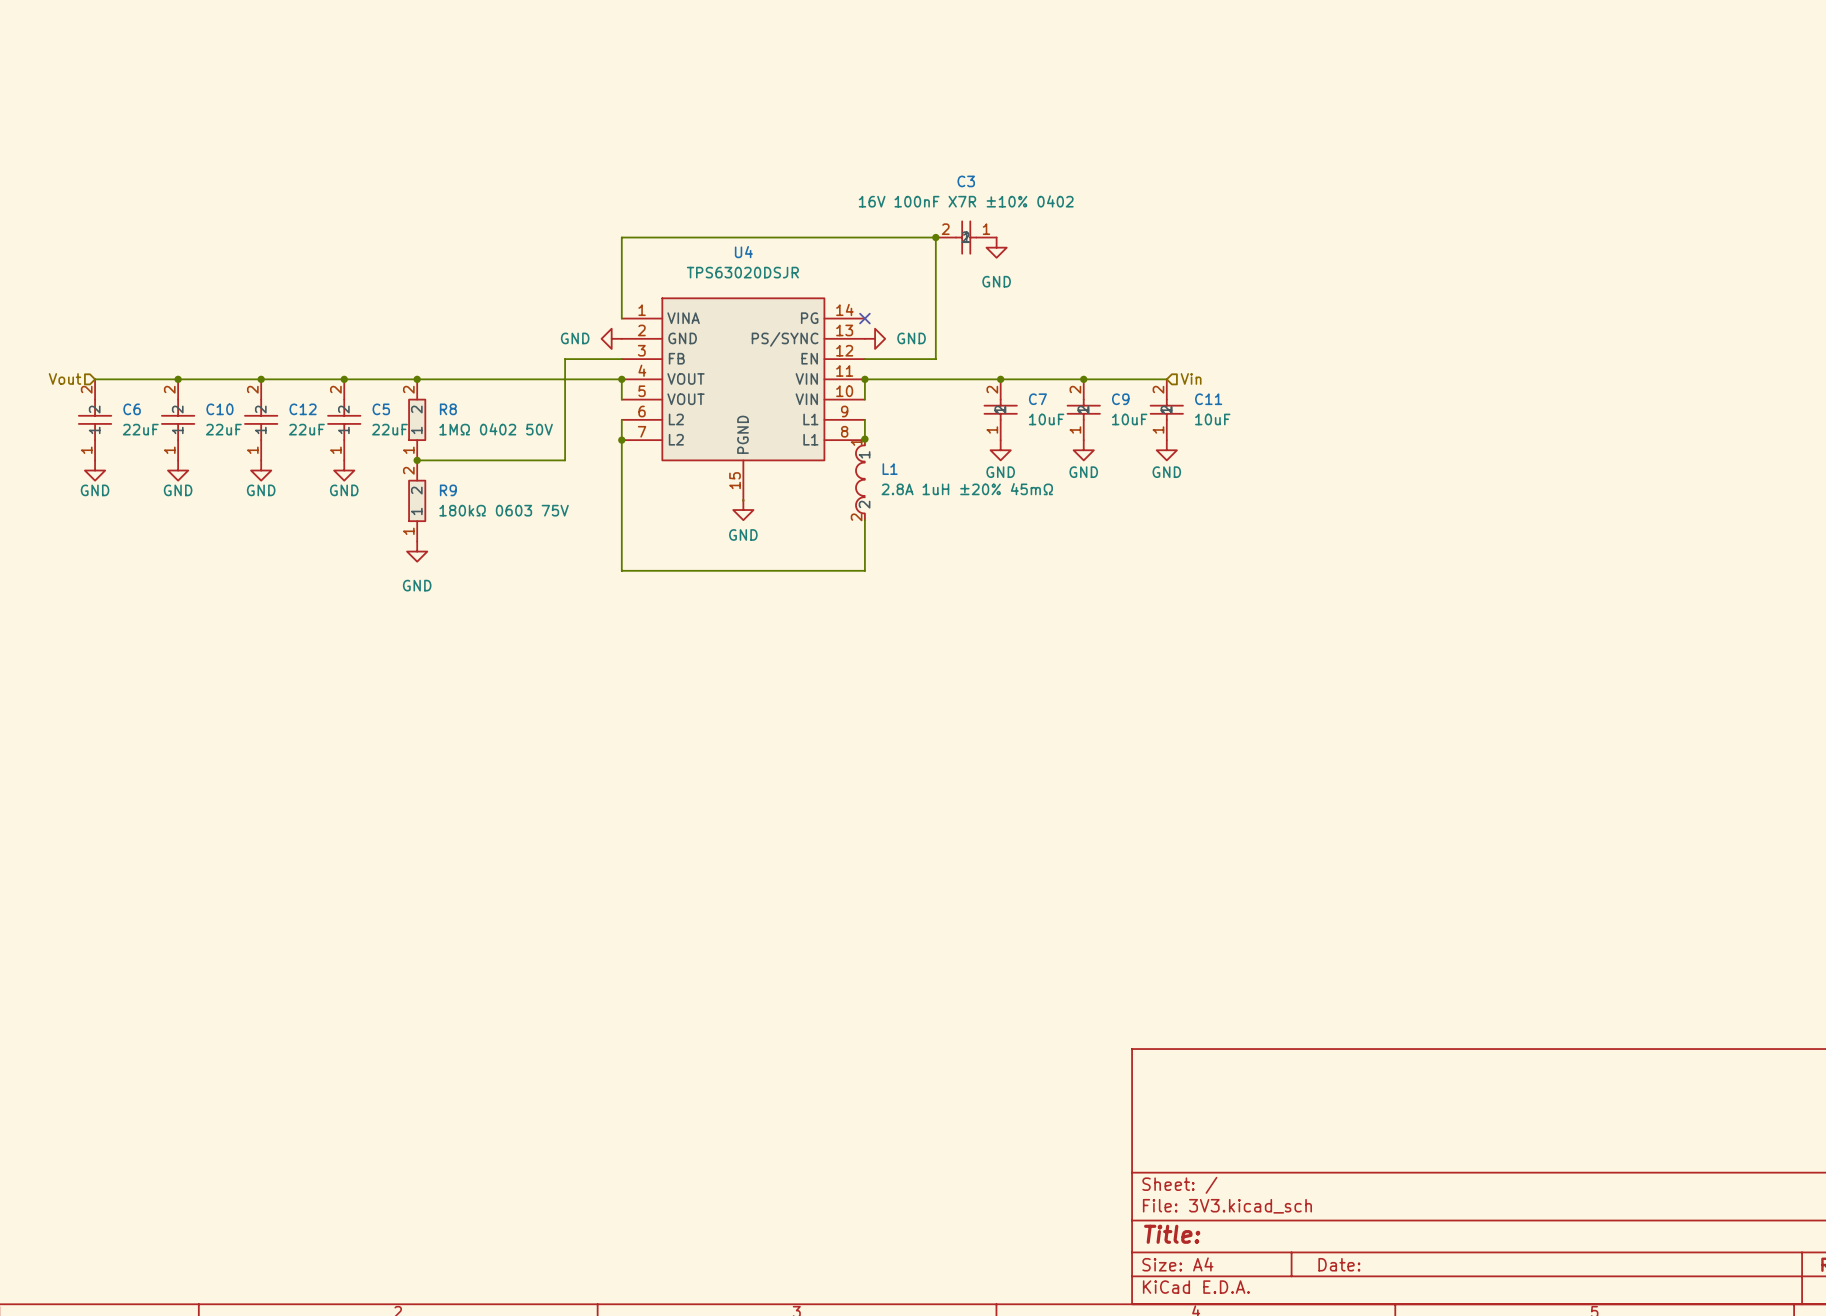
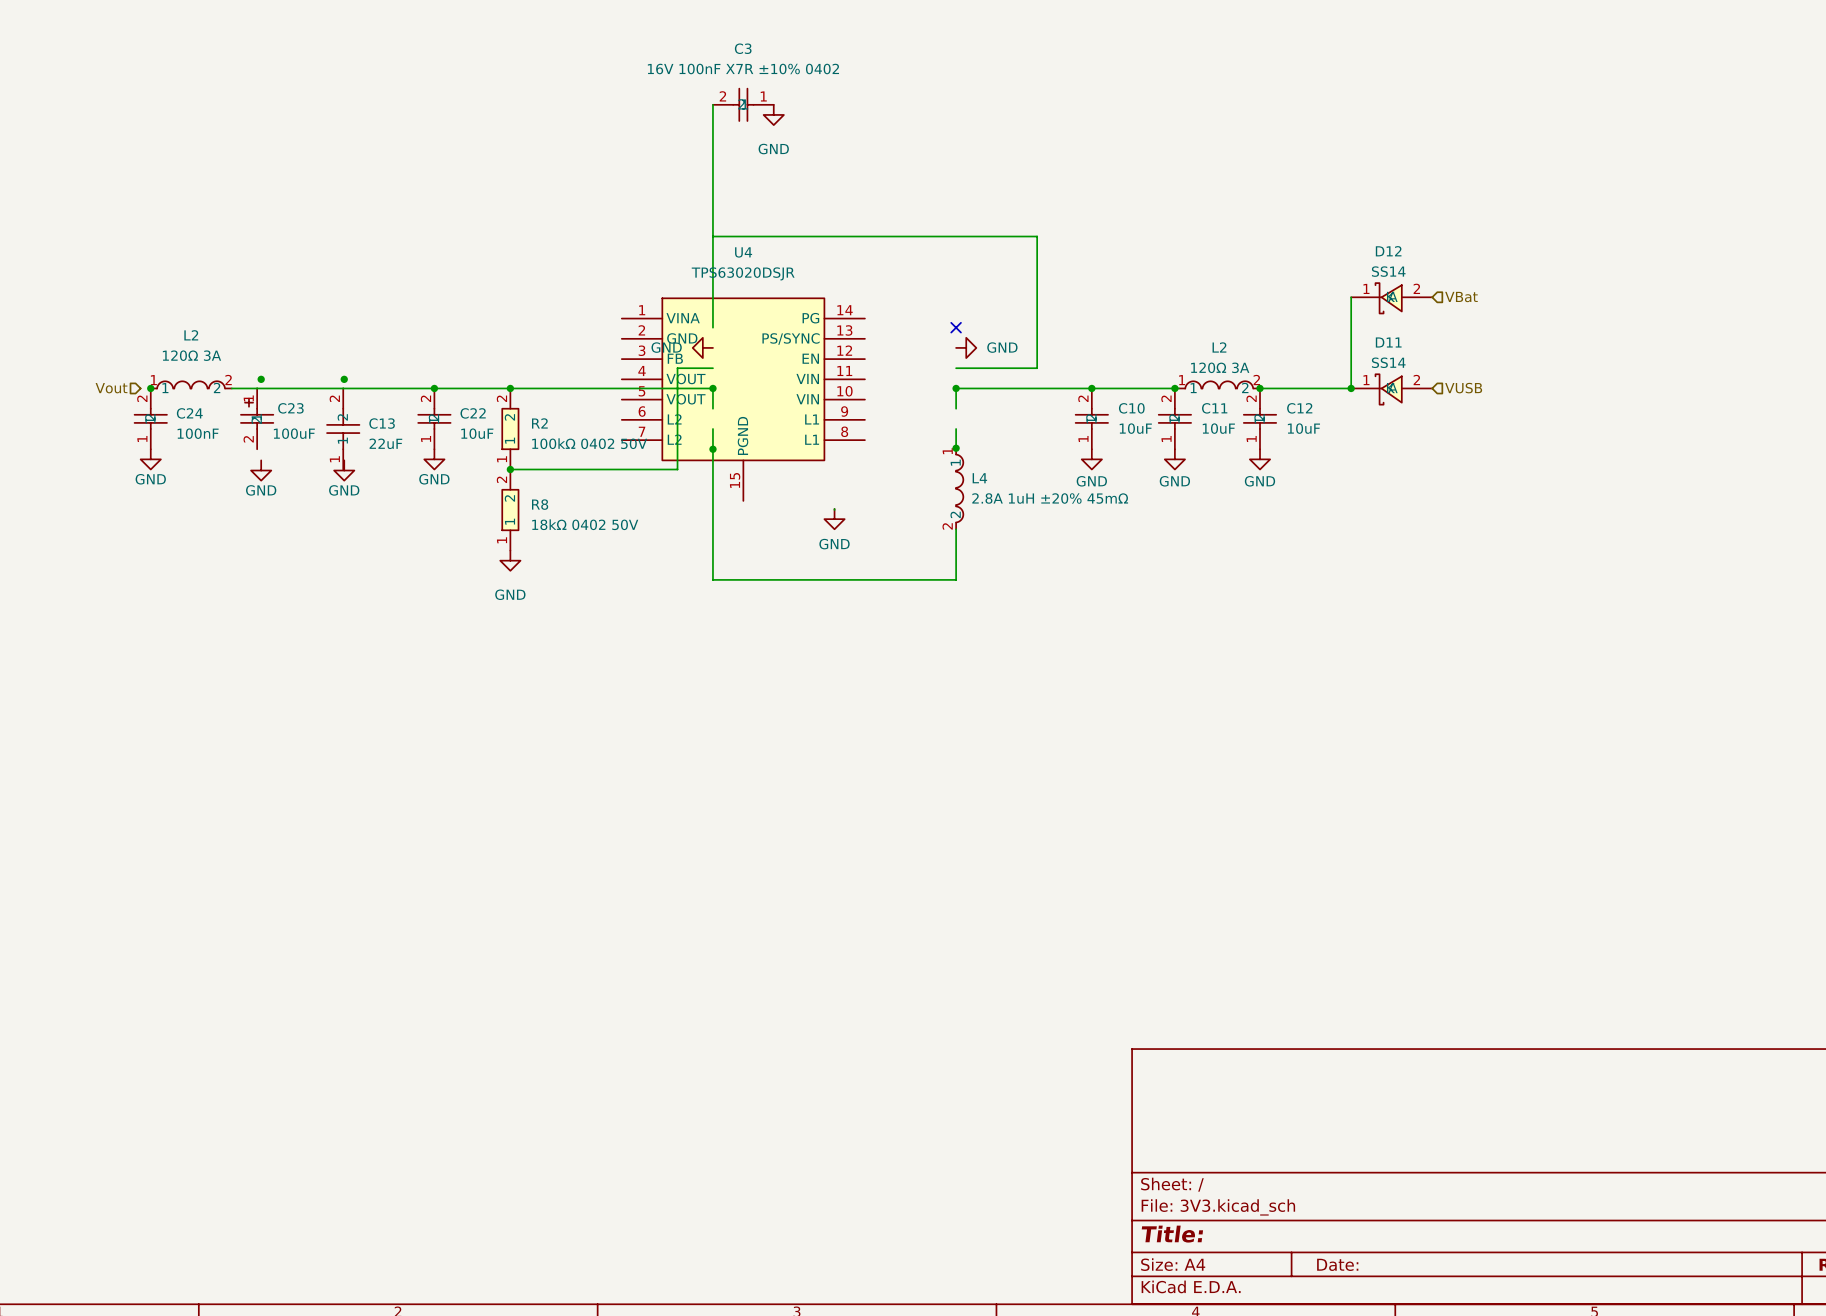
wire: none -> (712, 104) (712, 327)
power symbol: none -> GND (773, 114)
wire: none -> (712, 236) (1037, 236) (1037, 368) (956, 368)
junction: (935, 237) -> none
C3 position: (966, 237) -> (743, 104)
power symbol: GND (996, 247) -> none
hierarchical label: none -> VBat (1461, 297)
wire: none -> (1351, 297) (1351, 388) (1260, 388)
D12: none -> SS14 (1391, 298)
wire: (621, 318) (621, 237) (935, 237) (935, 359) (864, 359) -> none
no-connect mark: (864, 318) -> none
no-connect mark: none -> (956, 327)
power symbol: GND (611, 338) -> none
power symbol: GND (875, 338) -> none
power symbol: none -> GND (702, 347)
power symbol: none -> GND (966, 347)
wire: (621, 359) (565, 359) (565, 460) (417, 460) -> none
wire: none -> (712, 368) (677, 368) (677, 469) (508, 469)
hierarchical label position: Vout (64, 378) -> Vout (111, 388)
hierarchical label: Vin (1191, 378) -> none
wire: (95, 379) (621, 379) (621, 399) -> none
C10 symbol: [161, 379, 195, 461] -> [1075, 388, 1109, 450]
junction position: (178, 379) -> (150, 388)
C12 symbol: [244, 379, 278, 461] -> [1243, 388, 1277, 450]
junction position: (417, 379) -> (434, 388)
junction: (621, 379) -> none
junction: (864, 379) -> none
junction: (1000, 379) -> none
junction position: (1083, 379) -> (1091, 388)
wire: (1166, 379) (864, 379) (864, 399) -> none
L2: none -> 120Ω 3A (191, 384)
L2: none -> 120Ω 3A (1219, 384)
wire: none -> (231, 388) (712, 388) (712, 408)
junction: none -> (510, 388)
junction: none -> (712, 388)
junction: none -> (956, 388)
junction: none -> (1174, 388)
wire: none -> (1178, 388) (956, 388) (956, 408)
junction: none -> (1260, 388)
junction: none -> (1351, 388)
hierarchical label: none -> VUSB (1463, 388)
D11: none -> SS14 (1391, 389)
R8 name position: R8 (448, 409) -> R8 (540, 504)
C7: 10uF (1000, 409) -> none
C9: 10uF (1083, 409) -> none
C11 position: (1166, 409) -> (1174, 418)
C24: none -> 100nF (150, 418)
C23: none -> 100uF (257, 418)
C22: none -> 10uF (434, 418)
C6: 22uF (95, 419) -> none
C5: 22uF (344, 419) -> none
R8 position: (417, 419) -> (510, 510)
wire: (621, 419) (621, 570) (864, 570) (864, 520) -> (712, 428) (712, 579) (956, 579) (956, 529)
wire: (864, 419) (864, 440) -> (956, 428) (956, 449)
C13: none -> 22uF (343, 428)
R2: none -> 100kΩ 0402 50V (510, 428)
C10 value: 22uF (223, 429) -> 10uF (1135, 428)
C12 value: 22uF (306, 429) -> 10uF (1303, 428)
R8 value: 1MΩ 0402 50V (496, 429) -> 18kΩ 0402 50V (585, 524)
junction: (864, 439) -> none
junction: (621, 440) -> none
junction: none -> (956, 448)
junction: none -> (712, 449)
power symbol: GND (1000, 450) -> none
power symbol position: GND (1083, 450) -> GND (1091, 459)
power symbol position: GND (1166, 450) -> GND (1174, 459)
power symbol: none -> GND (150, 459)
power symbol: none -> GND (434, 459)
power symbol: none -> GND (1260, 459)
junction: (417, 460) -> none
junction: none -> (510, 469)
power symbol: GND (95, 470) -> none
power symbol: GND (178, 470) -> none
L1: 2.8A 1uH ±20% 45mΩ (860, 479) -> none
L4: none -> 2.8A 1uH ±20% 45mΩ (959, 488)
R9: 180kΩ 0603 75V (417, 500) -> none
power symbol: GND (743, 510) -> none
power symbol: none -> GND (834, 519)
power symbol: GND (417, 551) -> none
power symbol: none -> GND (510, 560)

